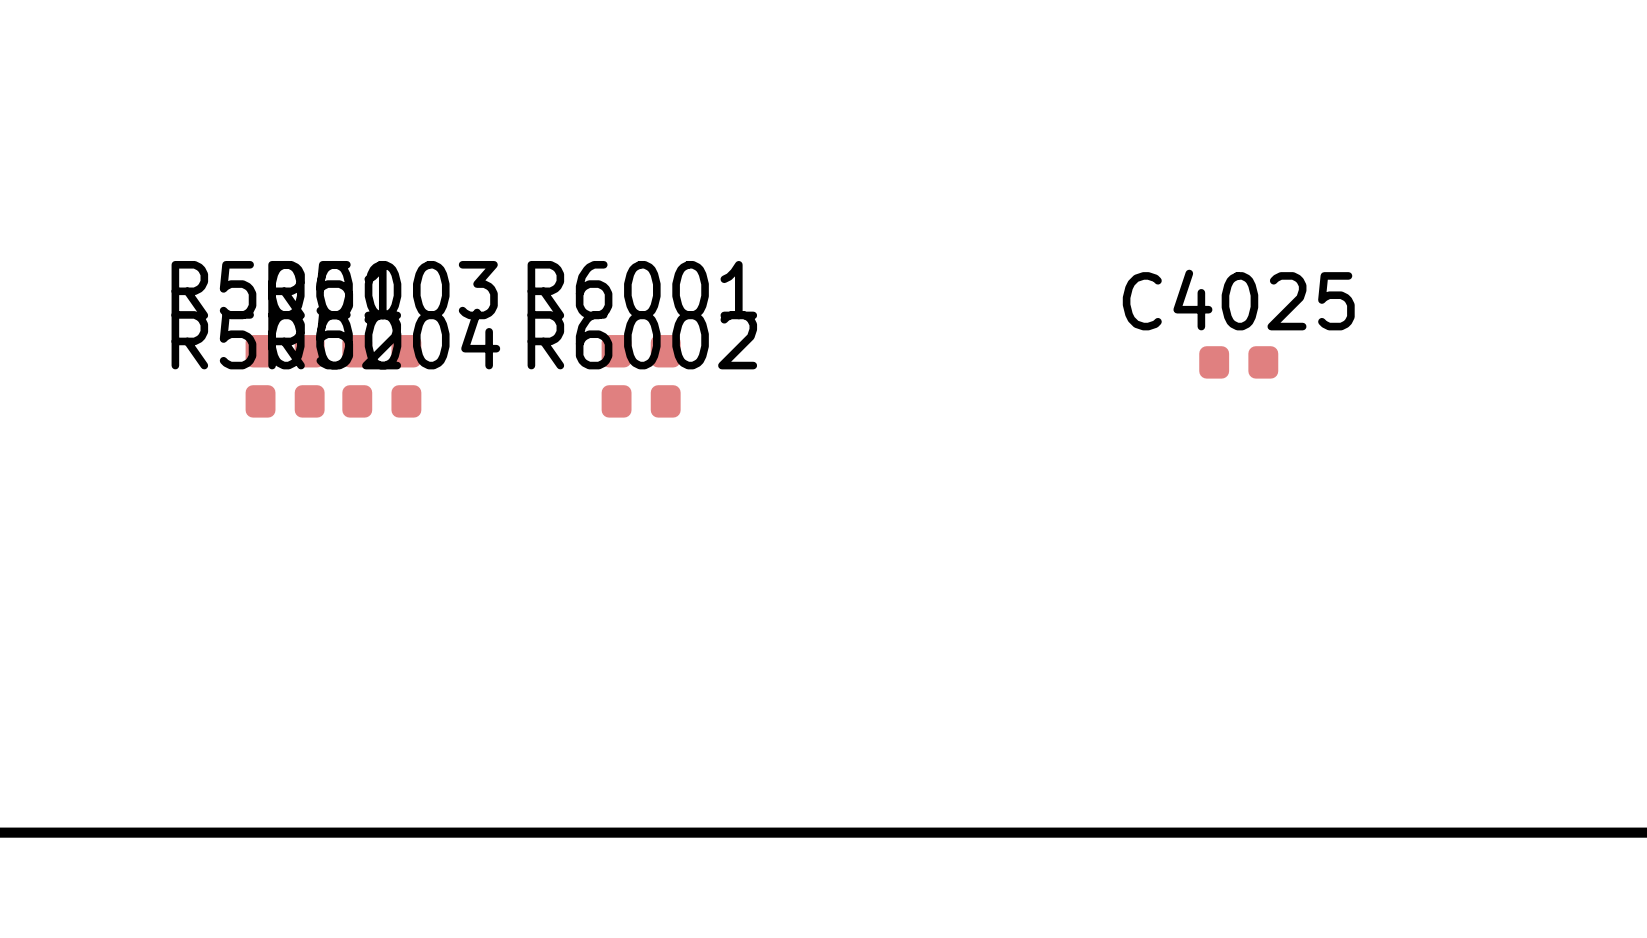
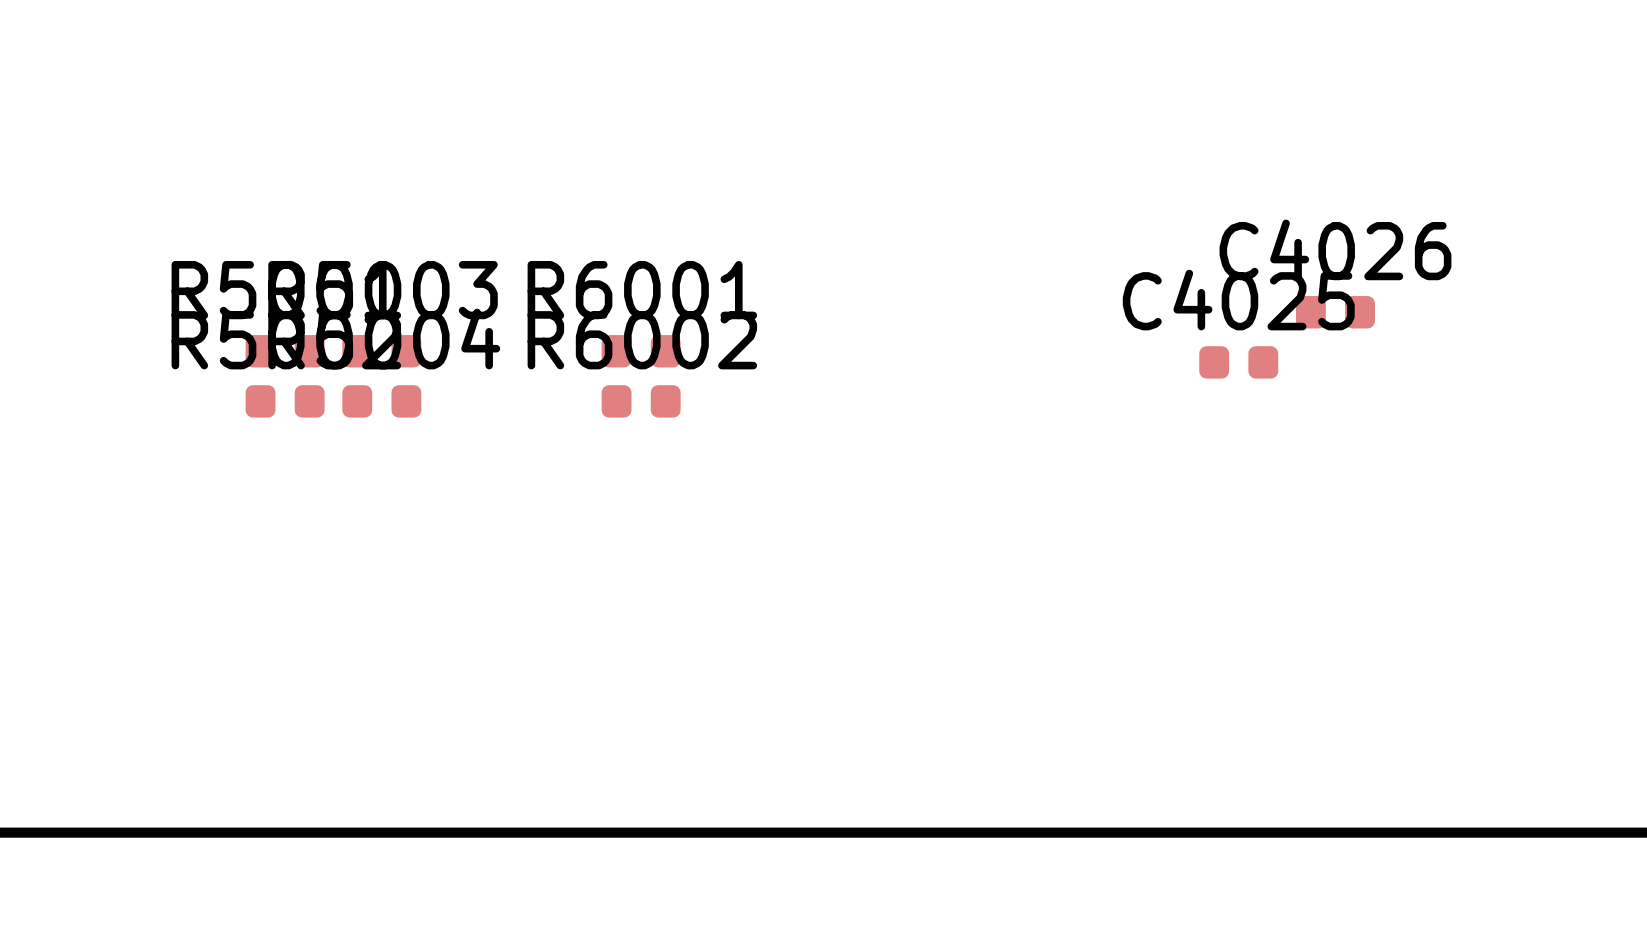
C4026: none -> (1335, 312)

